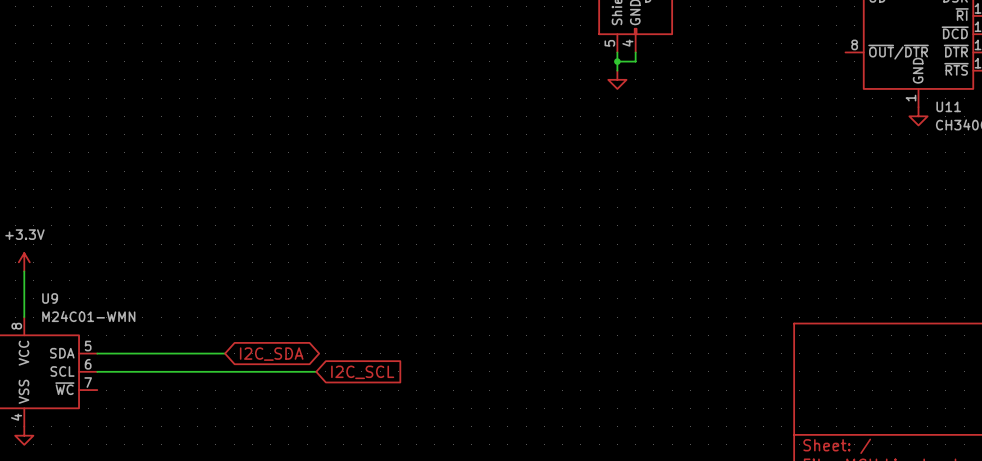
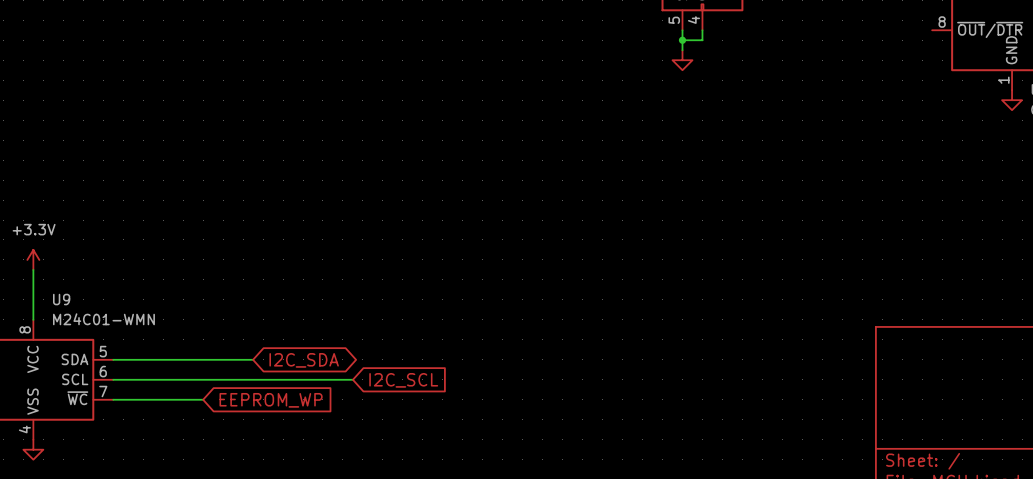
wire: none -> (113, 399) (203, 399)
global label: none -> EEPROM_WP (271, 400)

